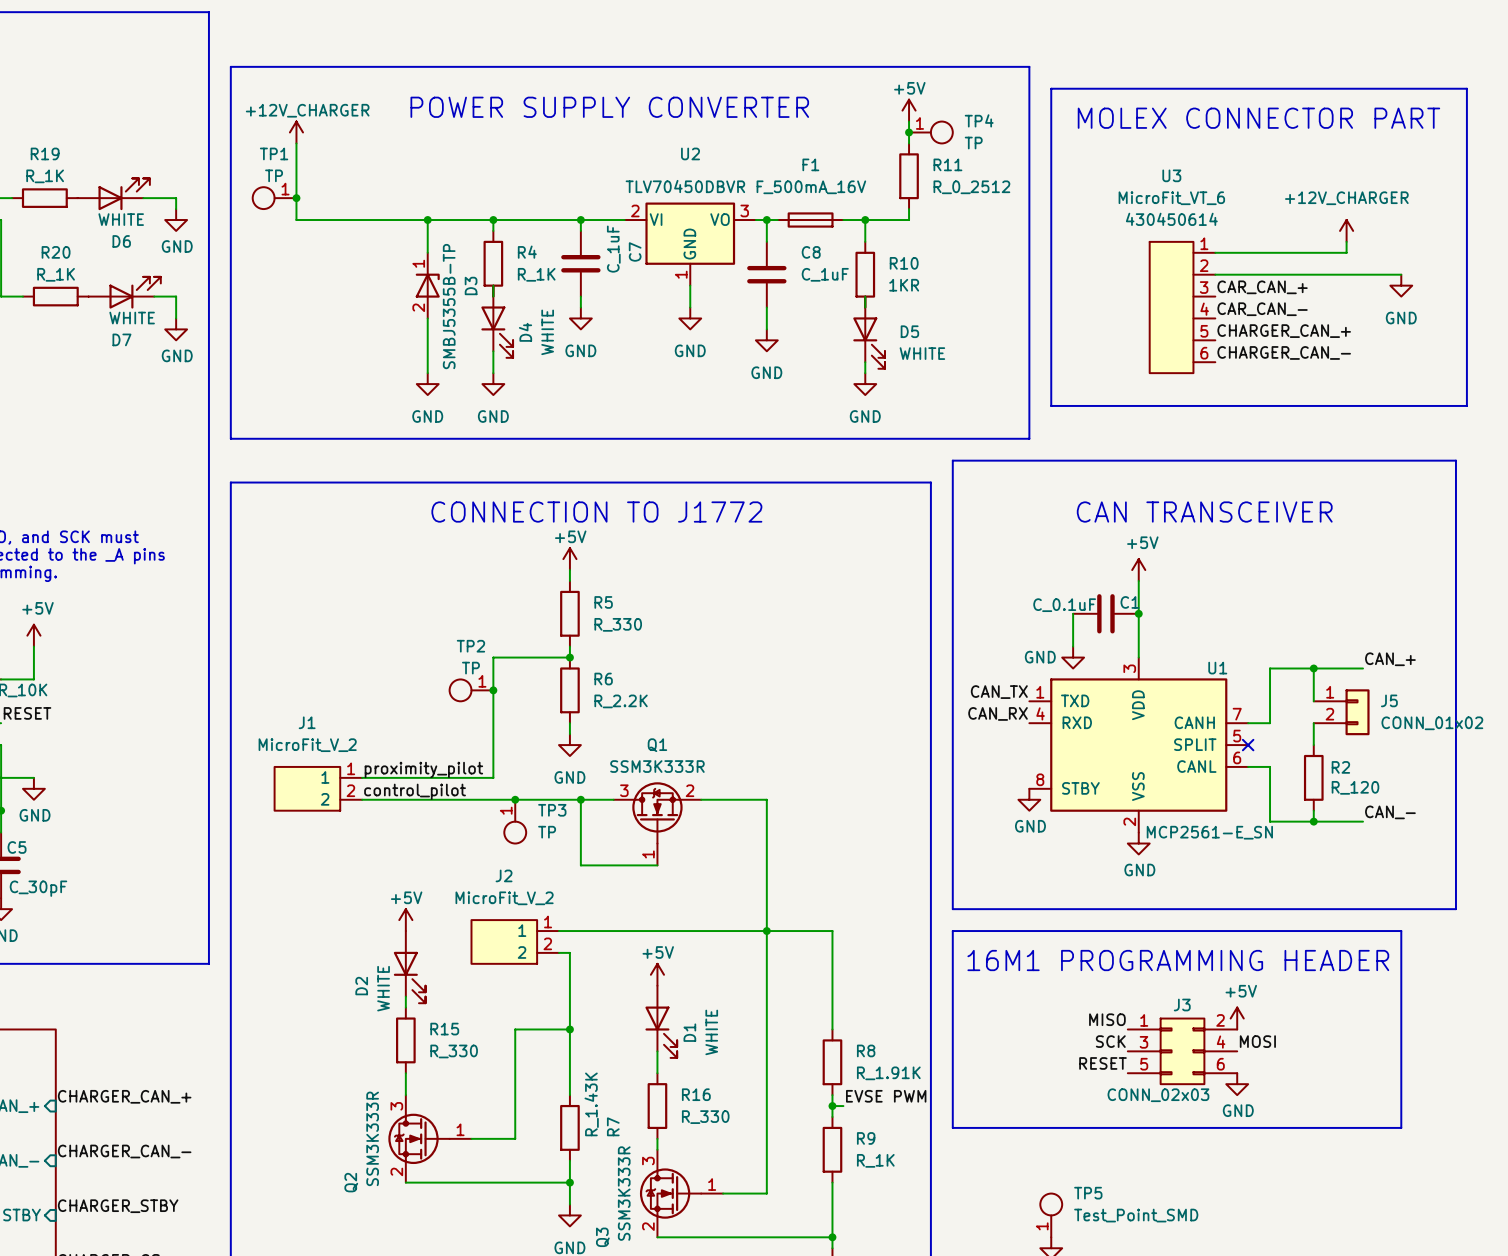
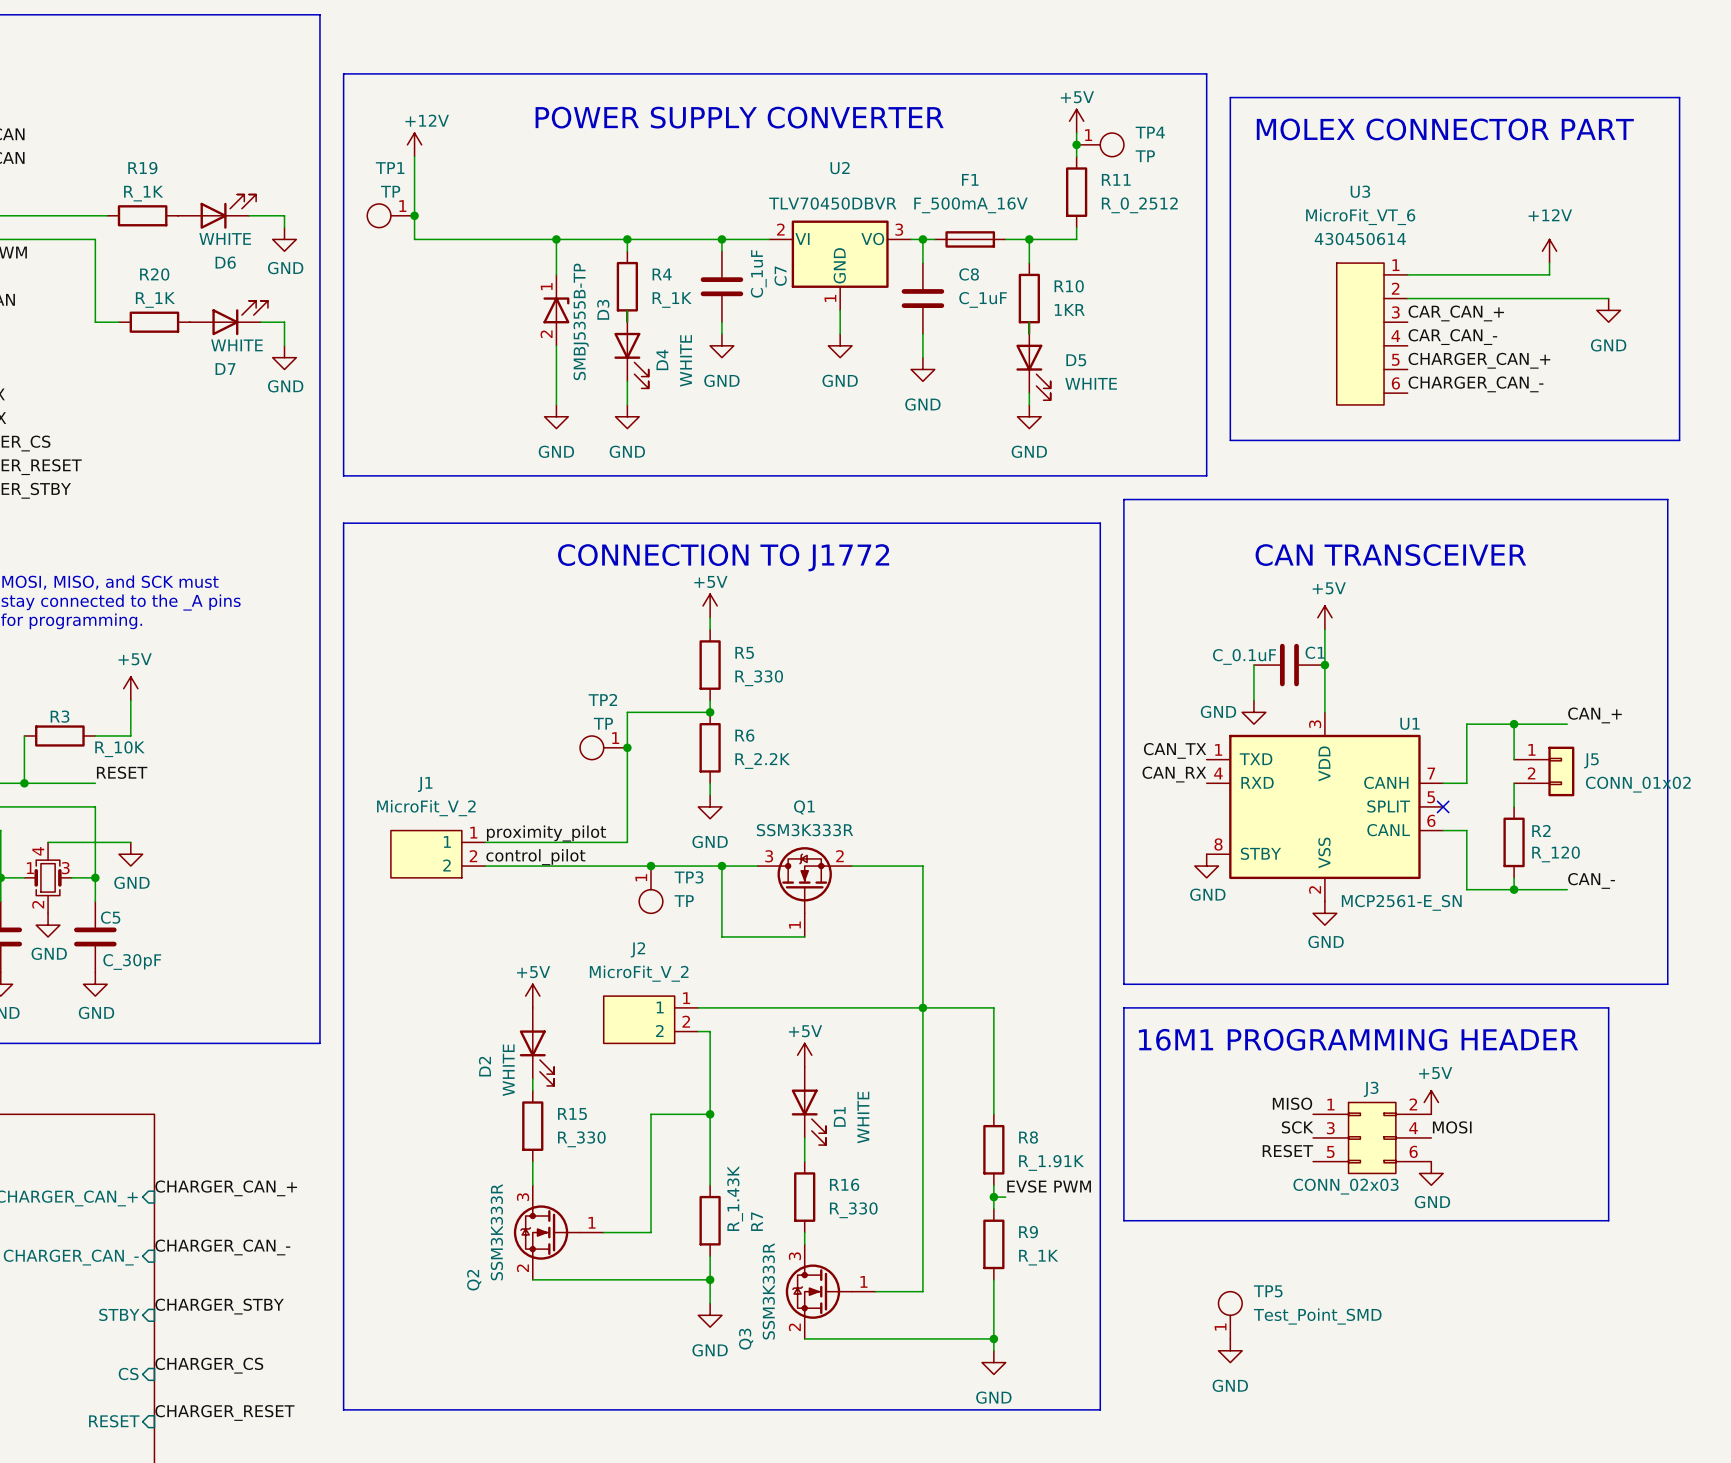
power symbol: +12V_CHARGER (296, 132) -> +12V (414, 144)
power symbol: +12V_CHARGER (1346, 230) -> +12V (1549, 251)

